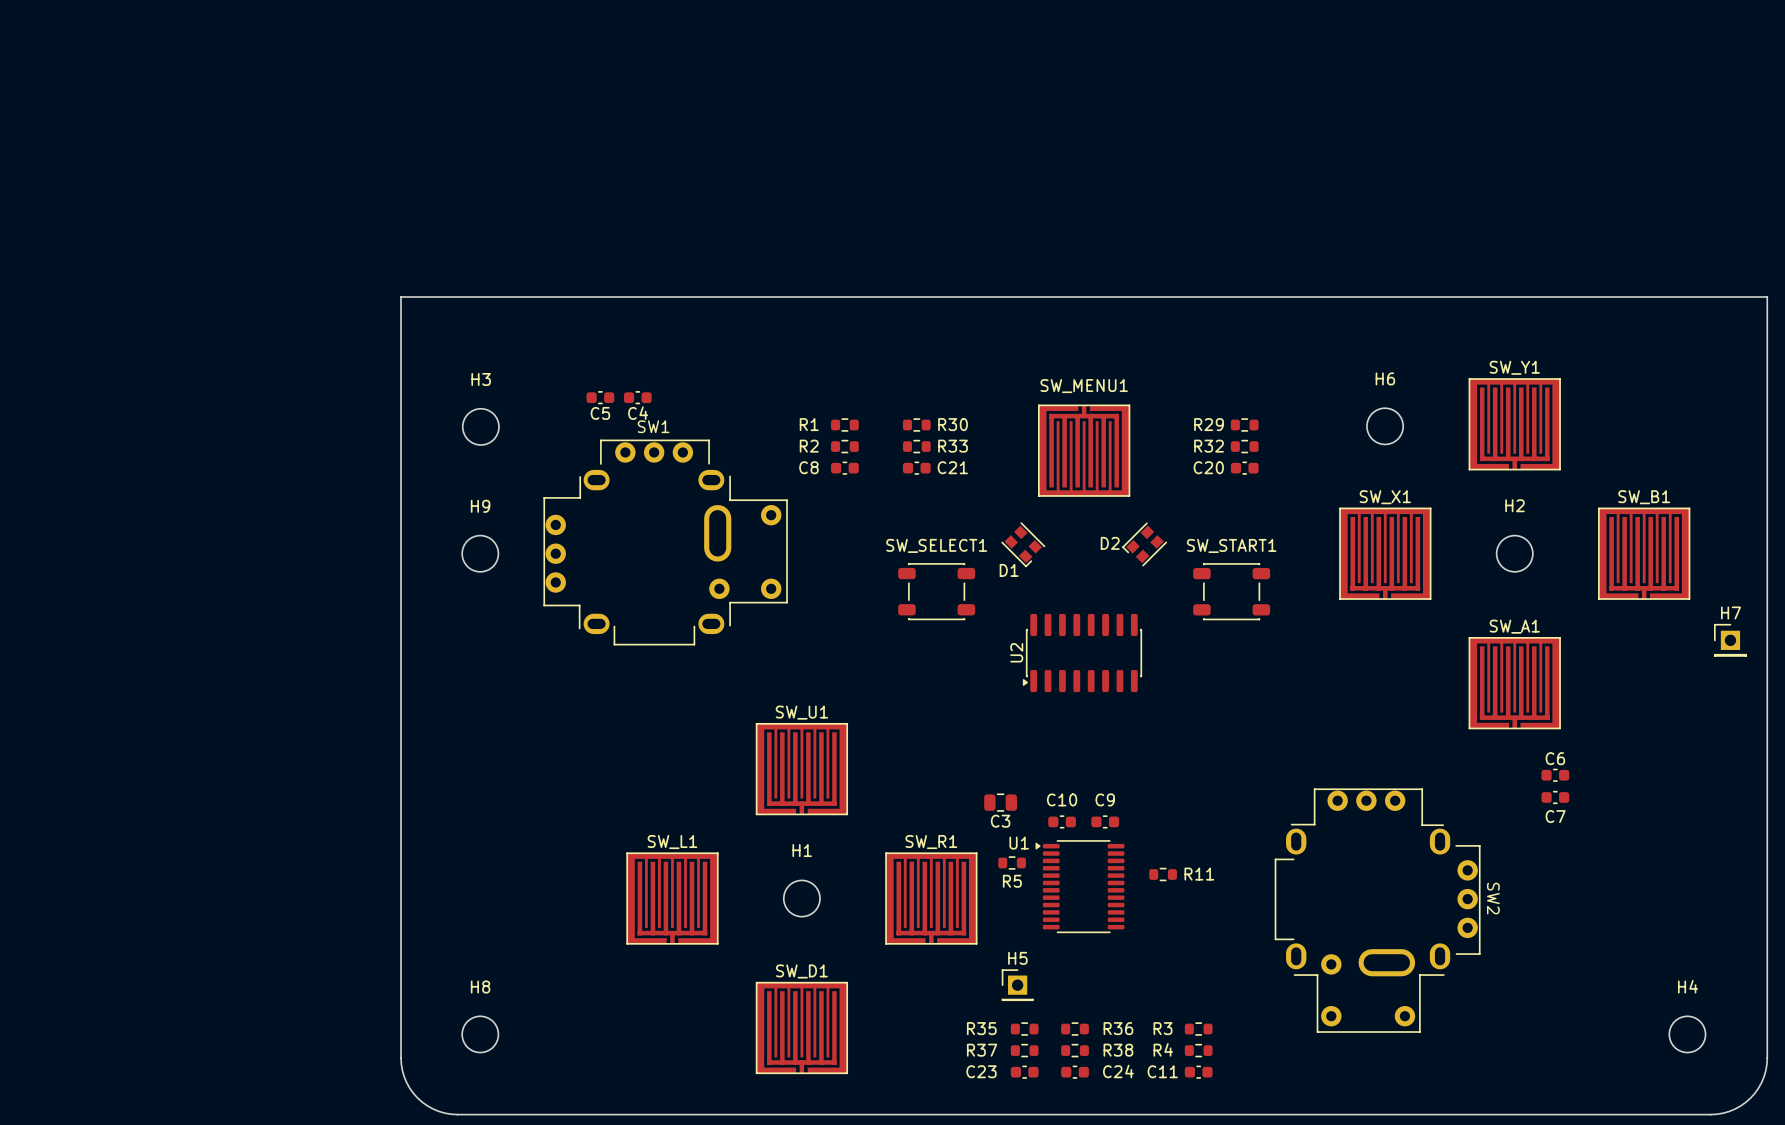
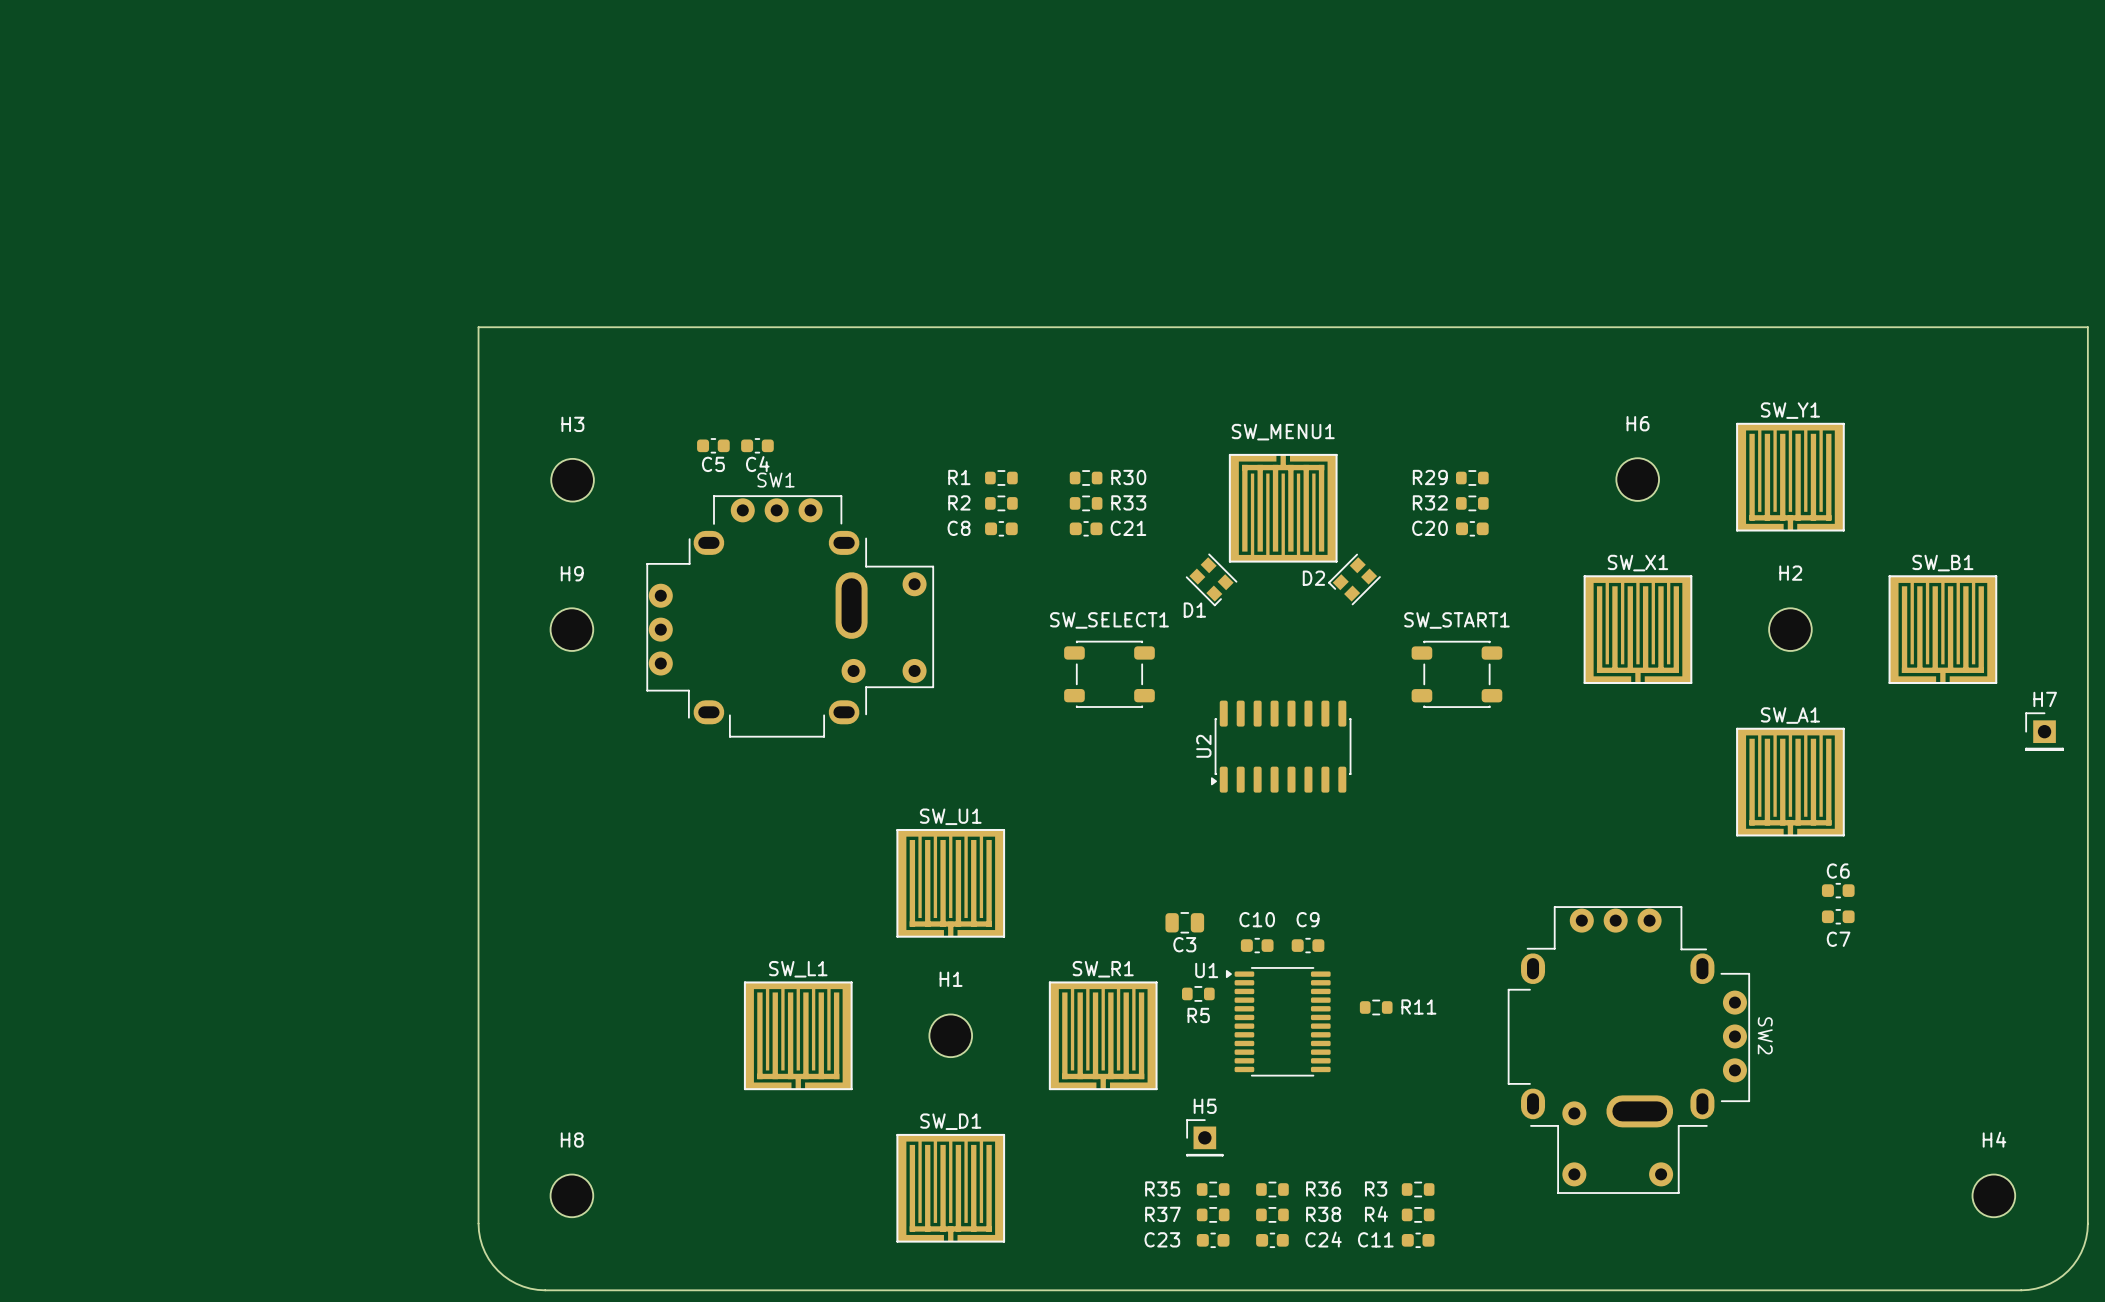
D1 position: (1023, 544) -> (1211, 579)
D2 position: (1144, 544) -> (1354, 579)

